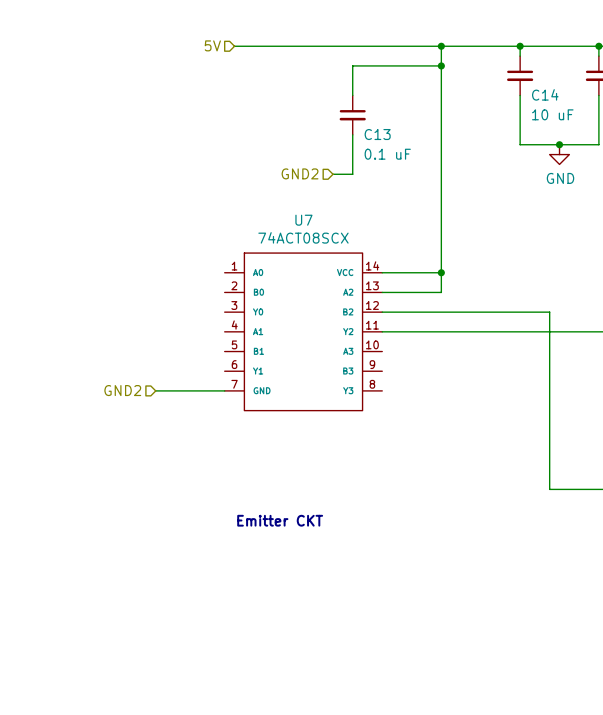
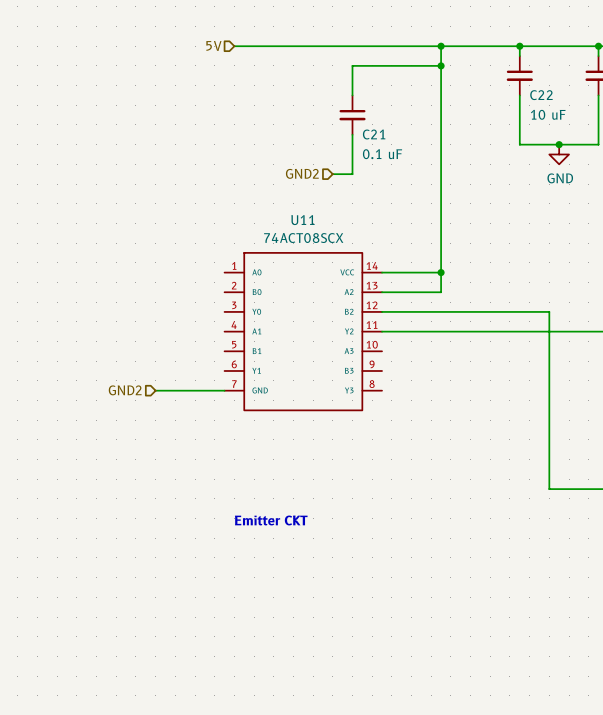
C14 name: C14 (545, 94) -> C22 (541, 95)
C13 name: C13 (377, 134) -> C21 (374, 134)
U7 name: U7 (303, 220) -> U11 (302, 220)

